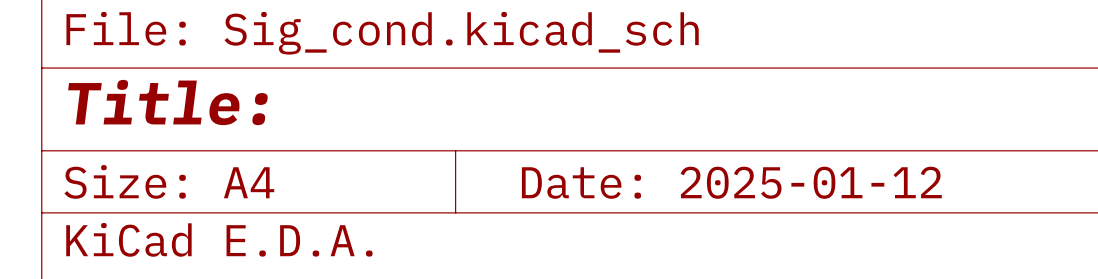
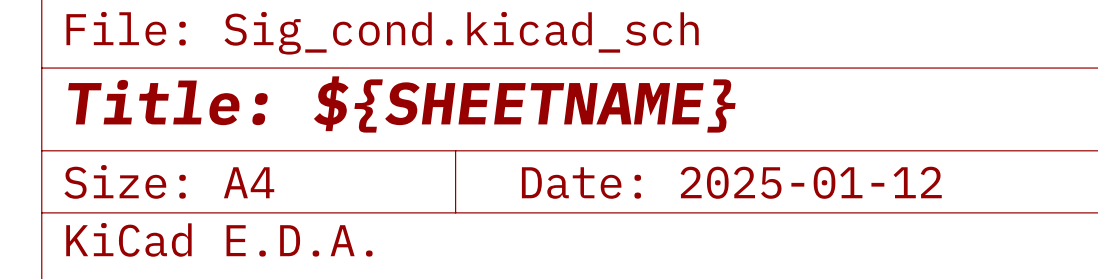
title block: Title: (168, 102) -> Title: ${SHEETNAME} (401, 104)

